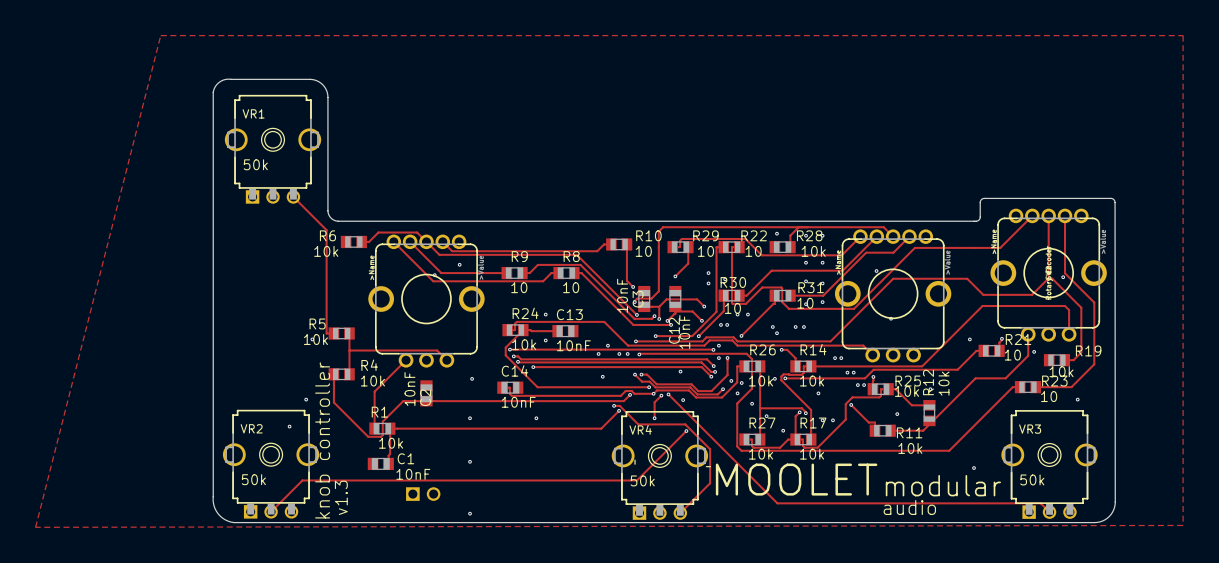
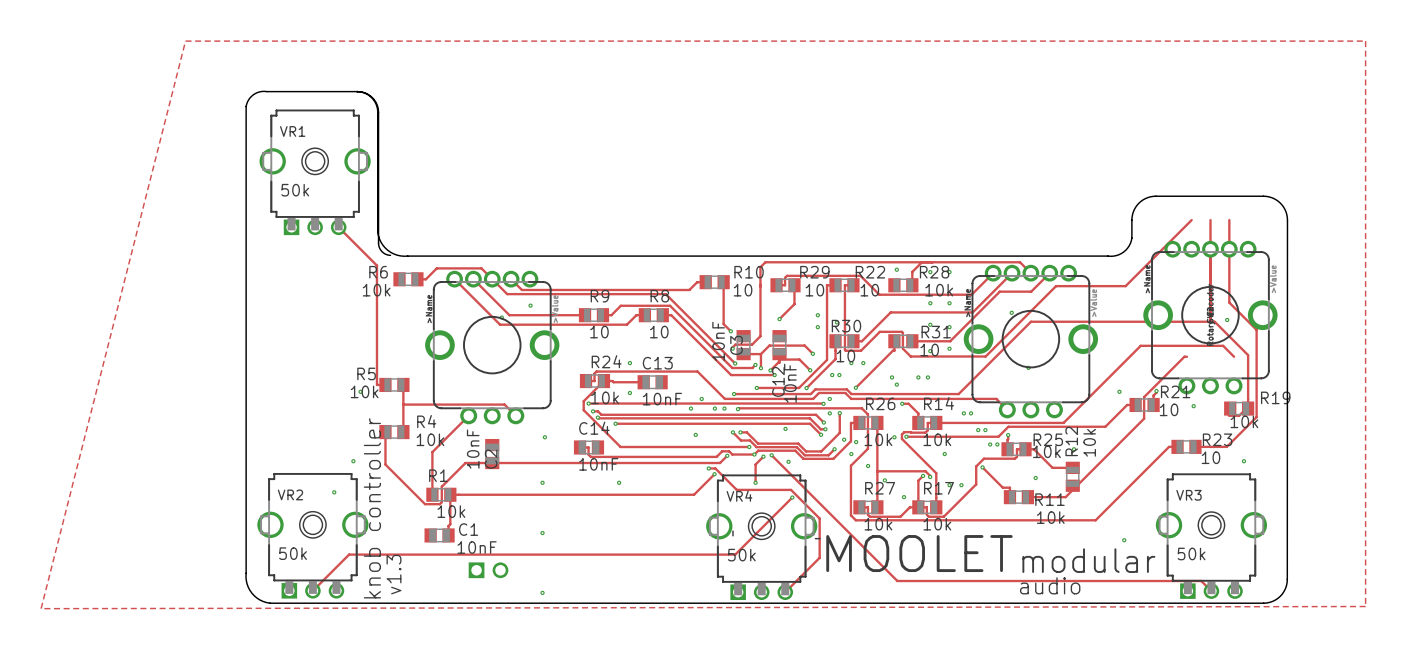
track: (1032, 215) (1000, 247) (975, 247) -> (1191, 220) (1125, 286)
track: (1065, 215) (1065, 273) (1094, 302) (1094, 364) (1071, 387) (1062, 387) -> (1229, 220) (1229, 302) (1256, 329) (1256, 417) (1226, 446)
board edge: (338, 221) (976, 221) (979, 218) (980, 202) (983, 198) (1112, 198) (1115, 202) (1115, 502) -> (356, 91) (369, 95) (375, 102) (377, 109) (378, 235) (387, 250) (400, 255) (1113, 256) (1121, 253) (1129, 245) (1131, 238) (1133, 212) (1138, 203) (1147, 197) (1263, 196) (1273, 198) (1283, 207) (1287, 220) (1287, 579)
track: (1048, 278) (1032, 294) (983, 294) (967, 278) -> (1210, 220) (1210, 321) (1116, 321)
track: none -> (1234, 356) (1223, 345) (1140, 345) (1063, 422)
track: (1028, 334) (1028, 355) (1005, 378) (975, 378) -> (1186, 356) (1184, 356) (1144, 397) (1144, 418) (1126, 436)
track: (1069, 334) (1069, 310) (1065, 306) (982, 306) (922, 366) -> none
R19 position: (1056, 360) -> (1239, 408)

